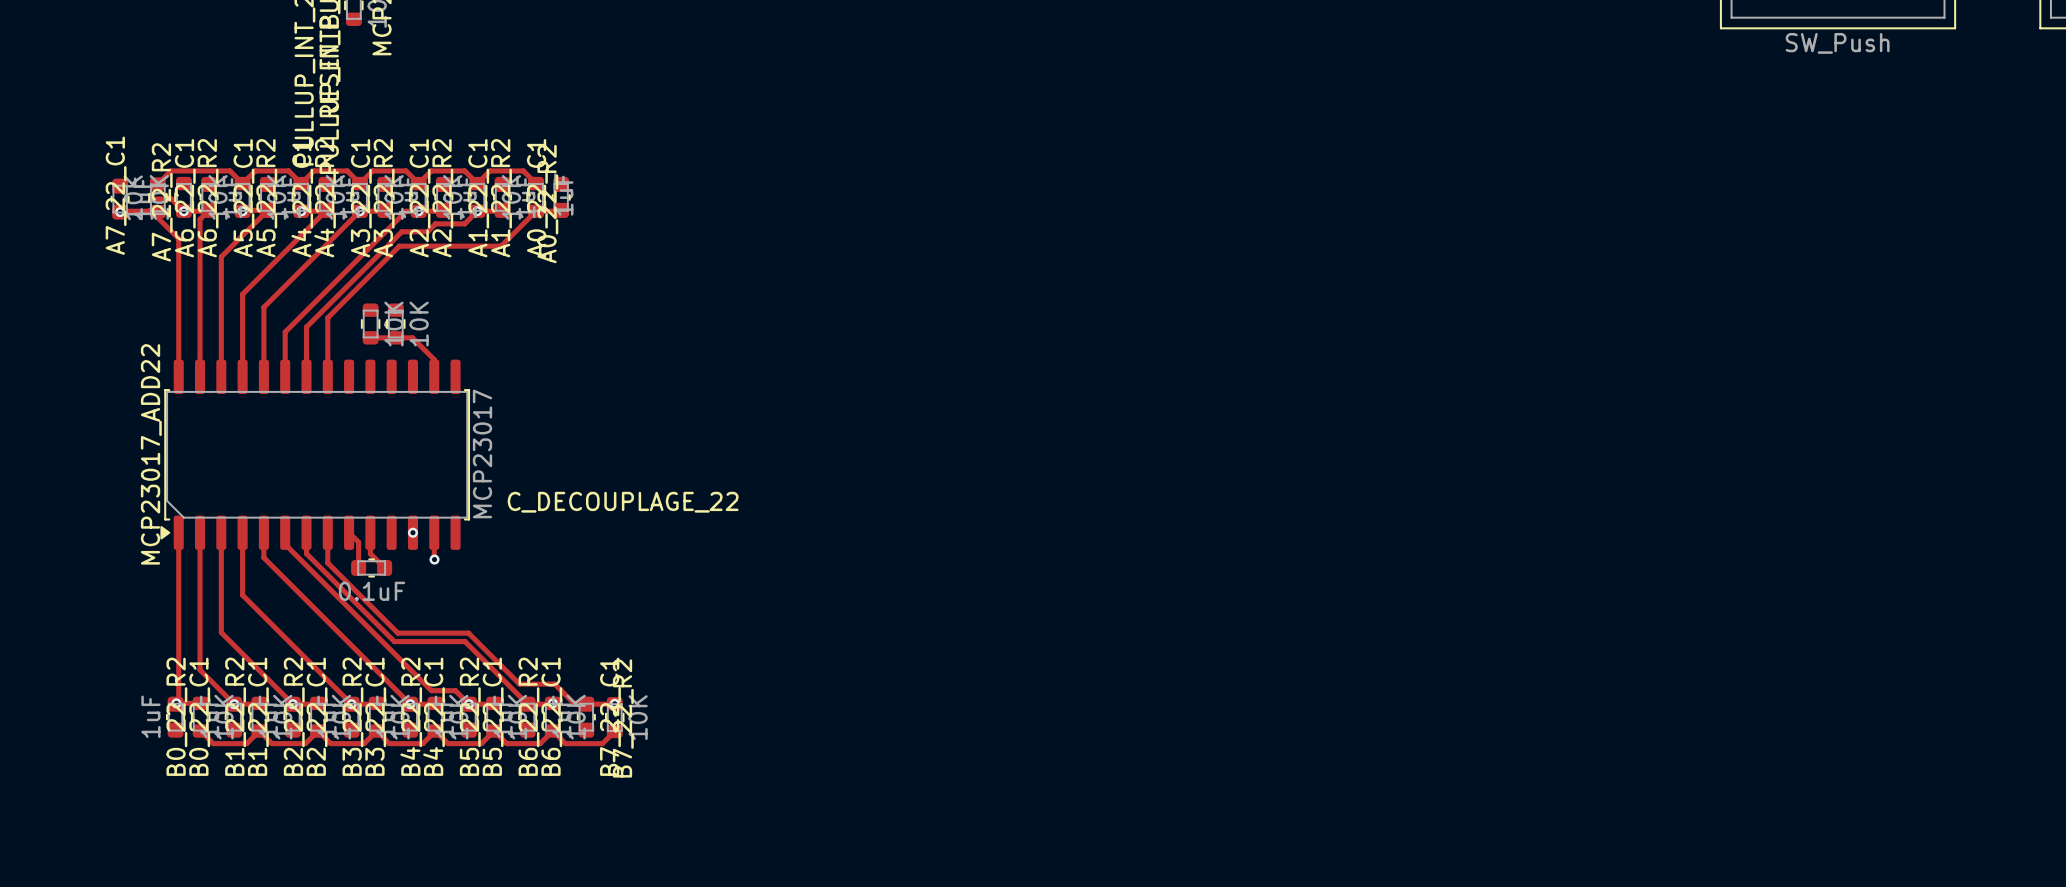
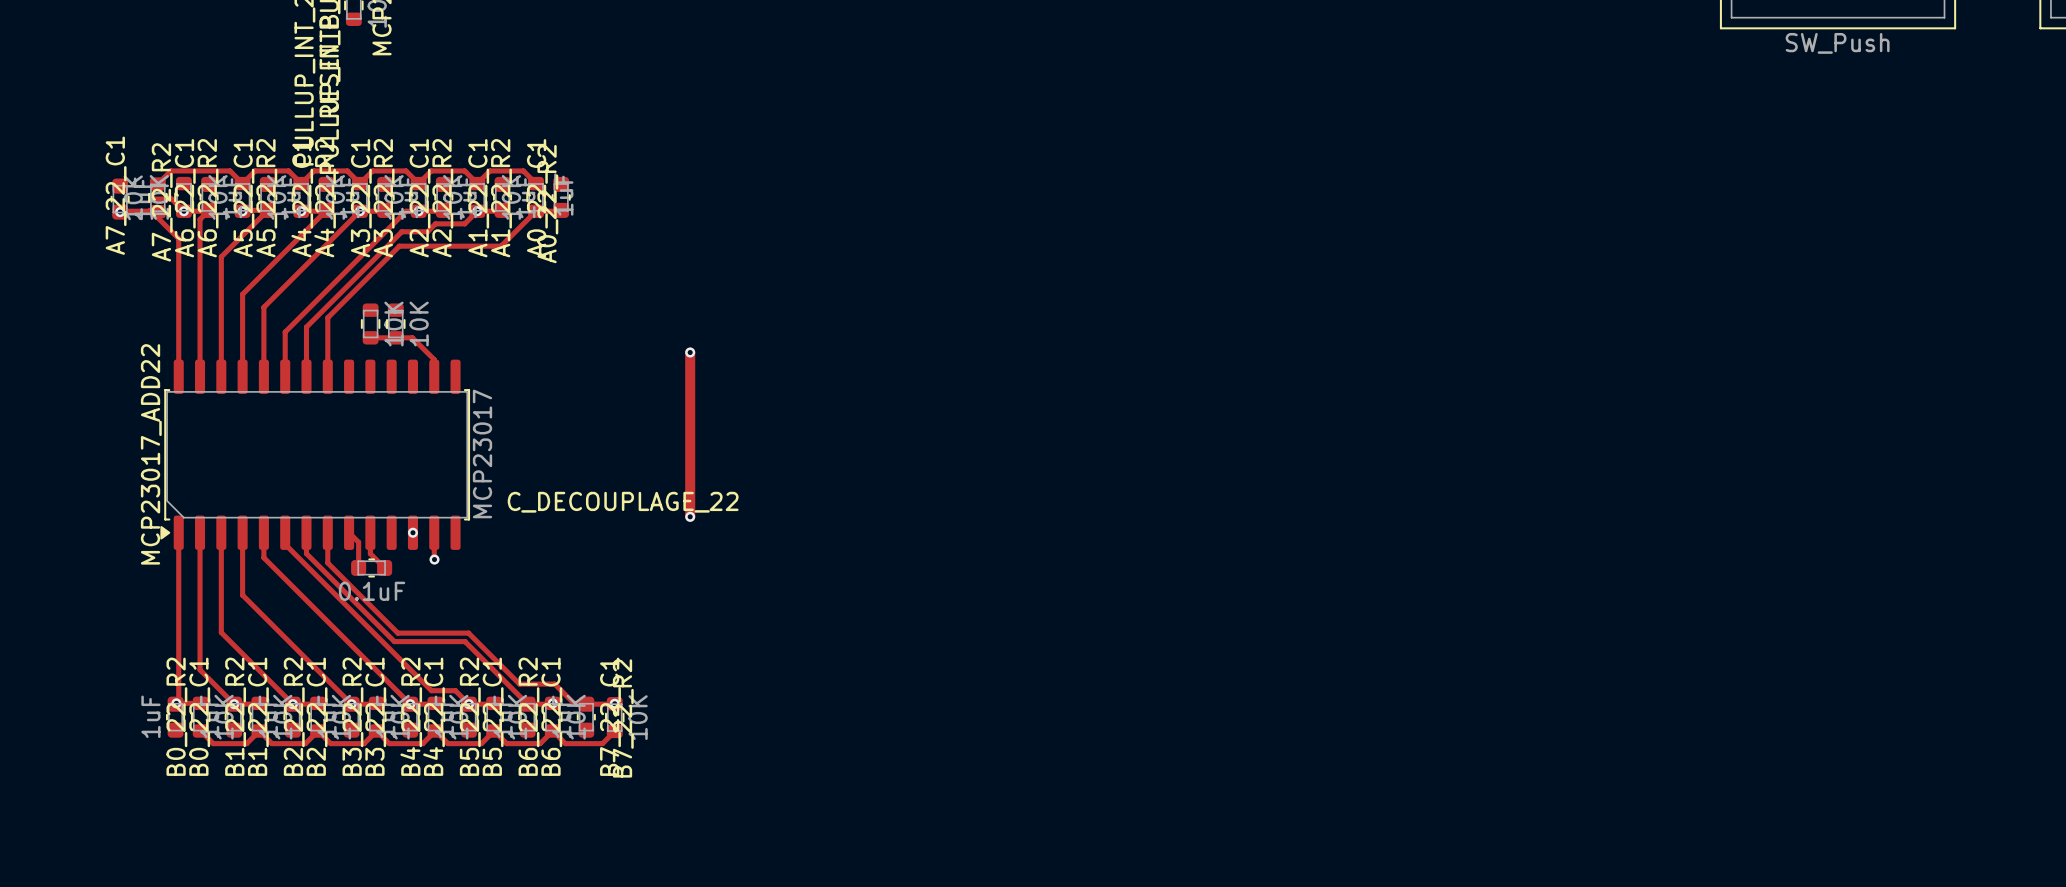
track: none -> (690, 352) (690, 516)
via: none -> (690, 352)
via: none -> (690, 516)

